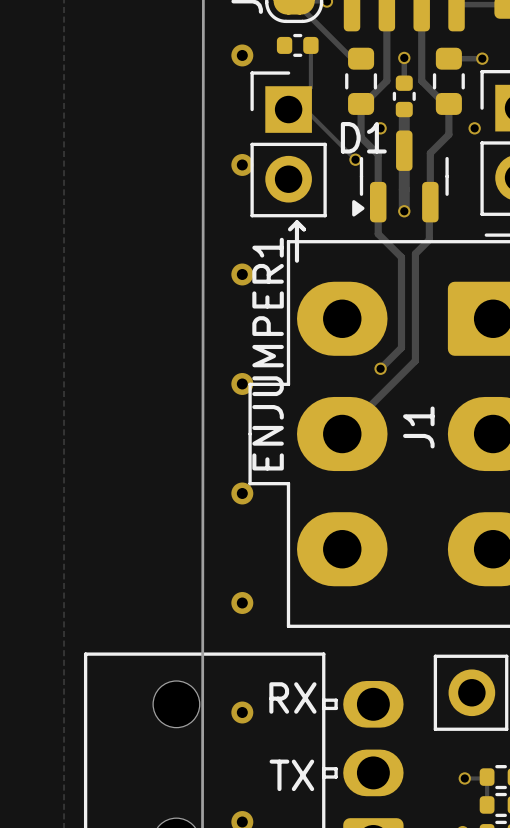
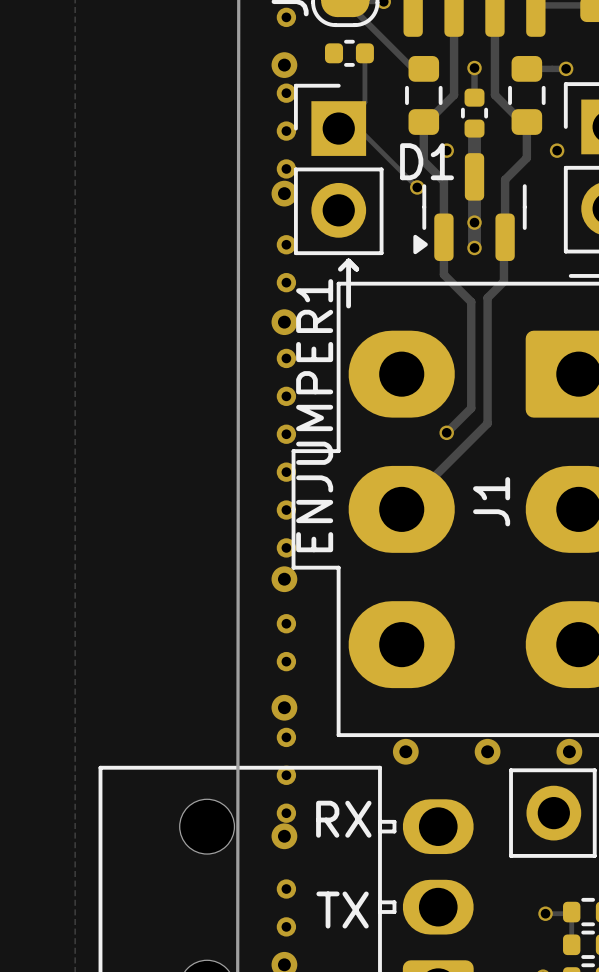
via: none -> (286, 17)
via: none -> (286, 93)
via: none -> (286, 131)
via: none -> (286, 168)
via: none -> (474, 222)
via: none -> (286, 244)
via: none -> (286, 282)
via: none -> (286, 358)
via: none -> (286, 396)
via: none -> (286, 434)
via: (242, 383) -> none
via: none -> (286, 472)
via: none -> (286, 510)
via: none -> (286, 547)
via: none -> (286, 623)
via: none -> (286, 661)
via: none -> (286, 737)
via: none -> (405, 751)
via: none -> (487, 751)
via: none -> (569, 751)
via: none -> (286, 775)
via: none -> (286, 813)
via: none -> (286, 889)
via: none -> (286, 926)

